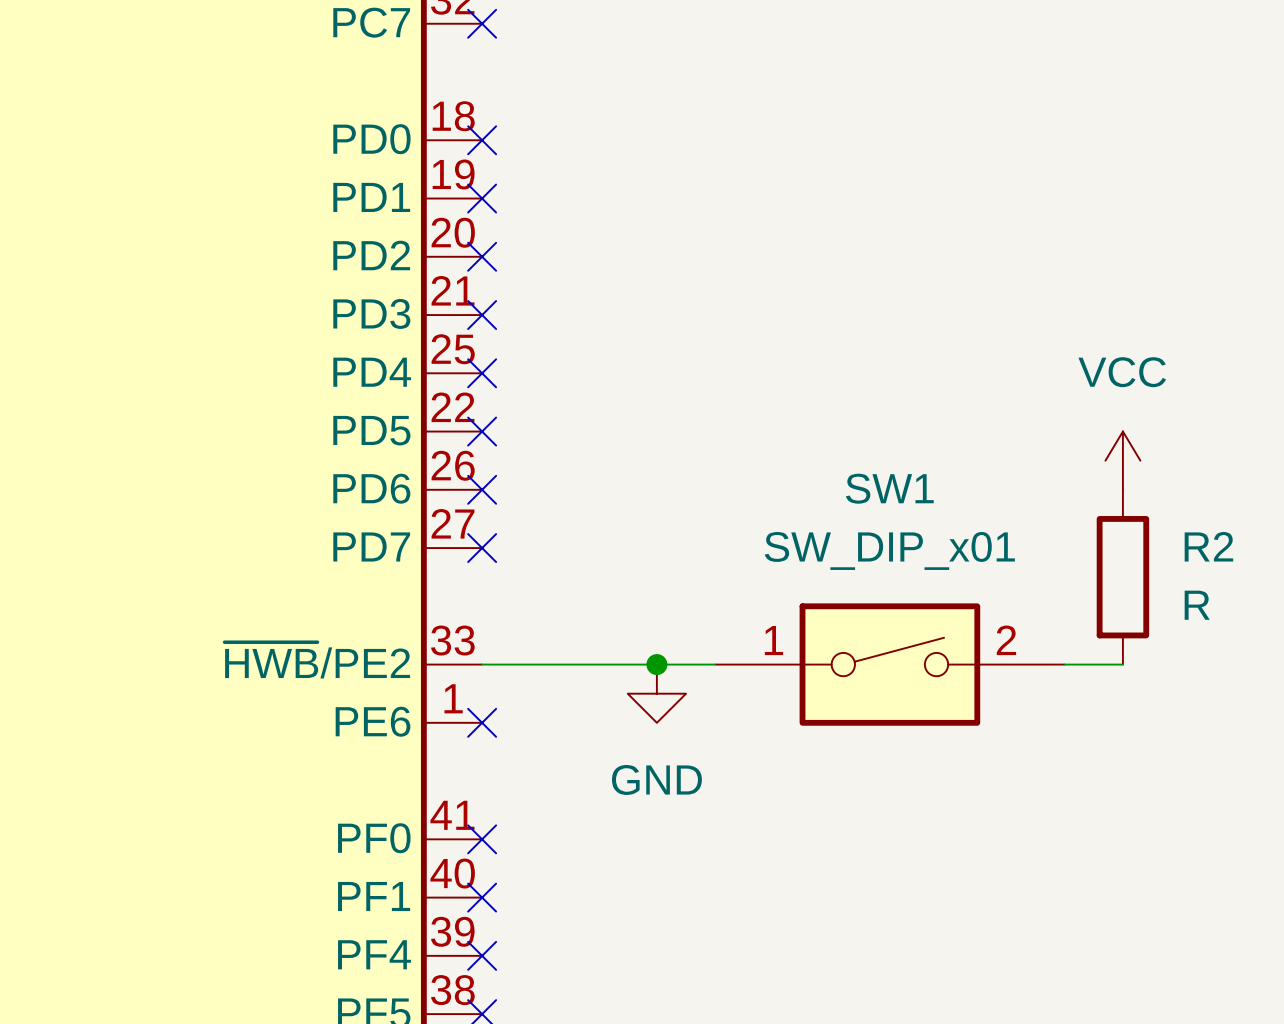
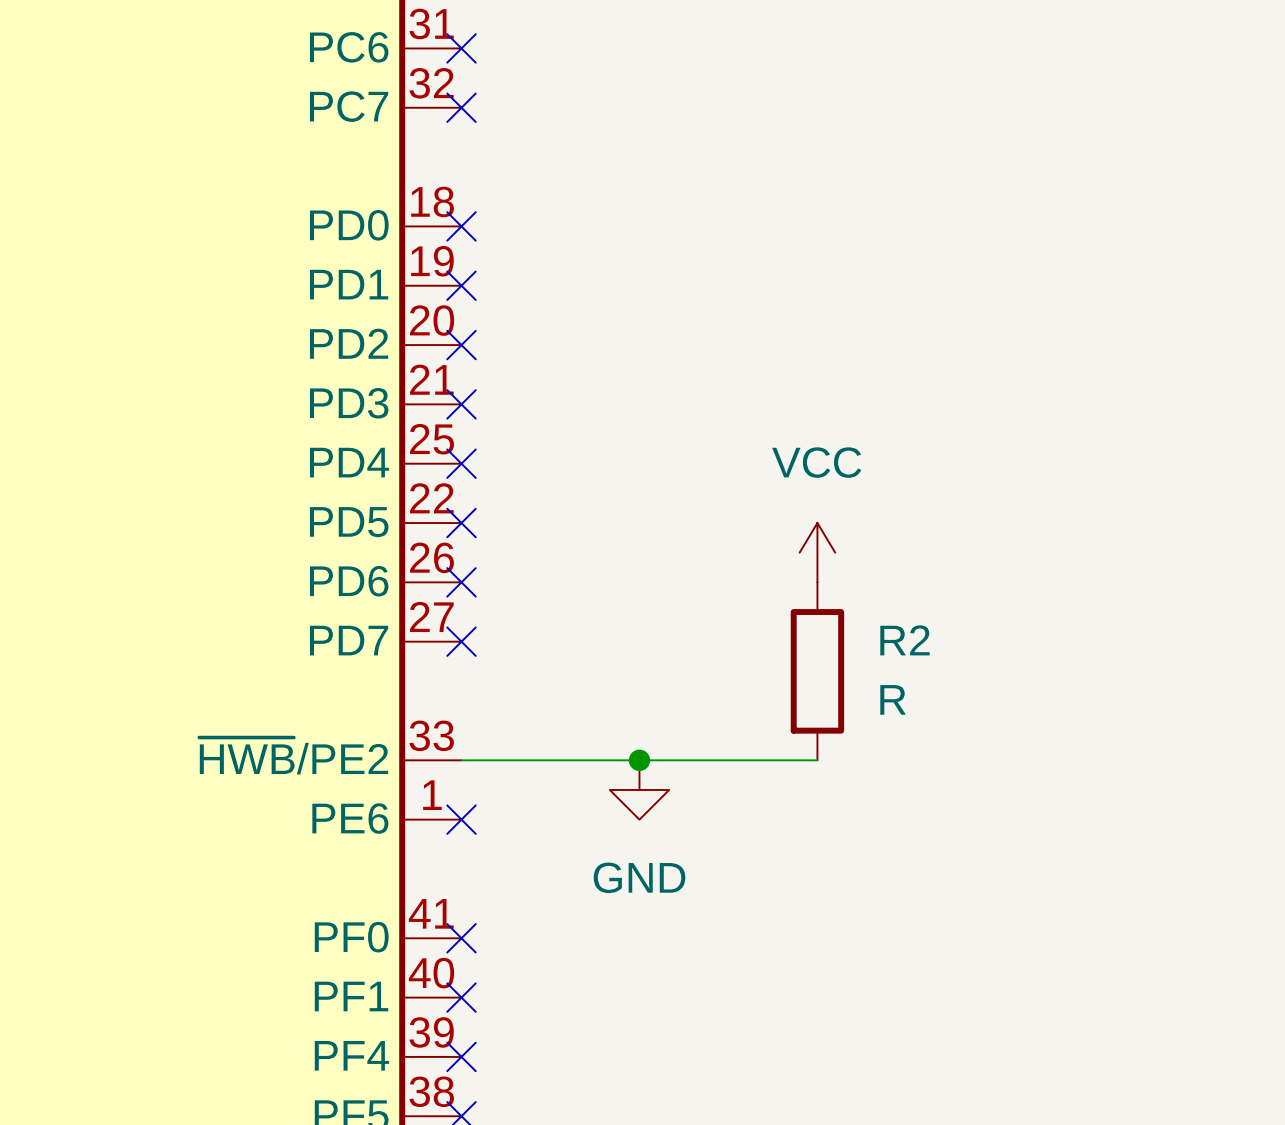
power symbol position: VCC (1122, 460) -> VCC (817, 552)
R2 position: (1122, 577) -> (817, 671)
SW1: SW_DIP_x01 (889, 664) -> none
wire: (1064, 664) (1122, 664) -> none

